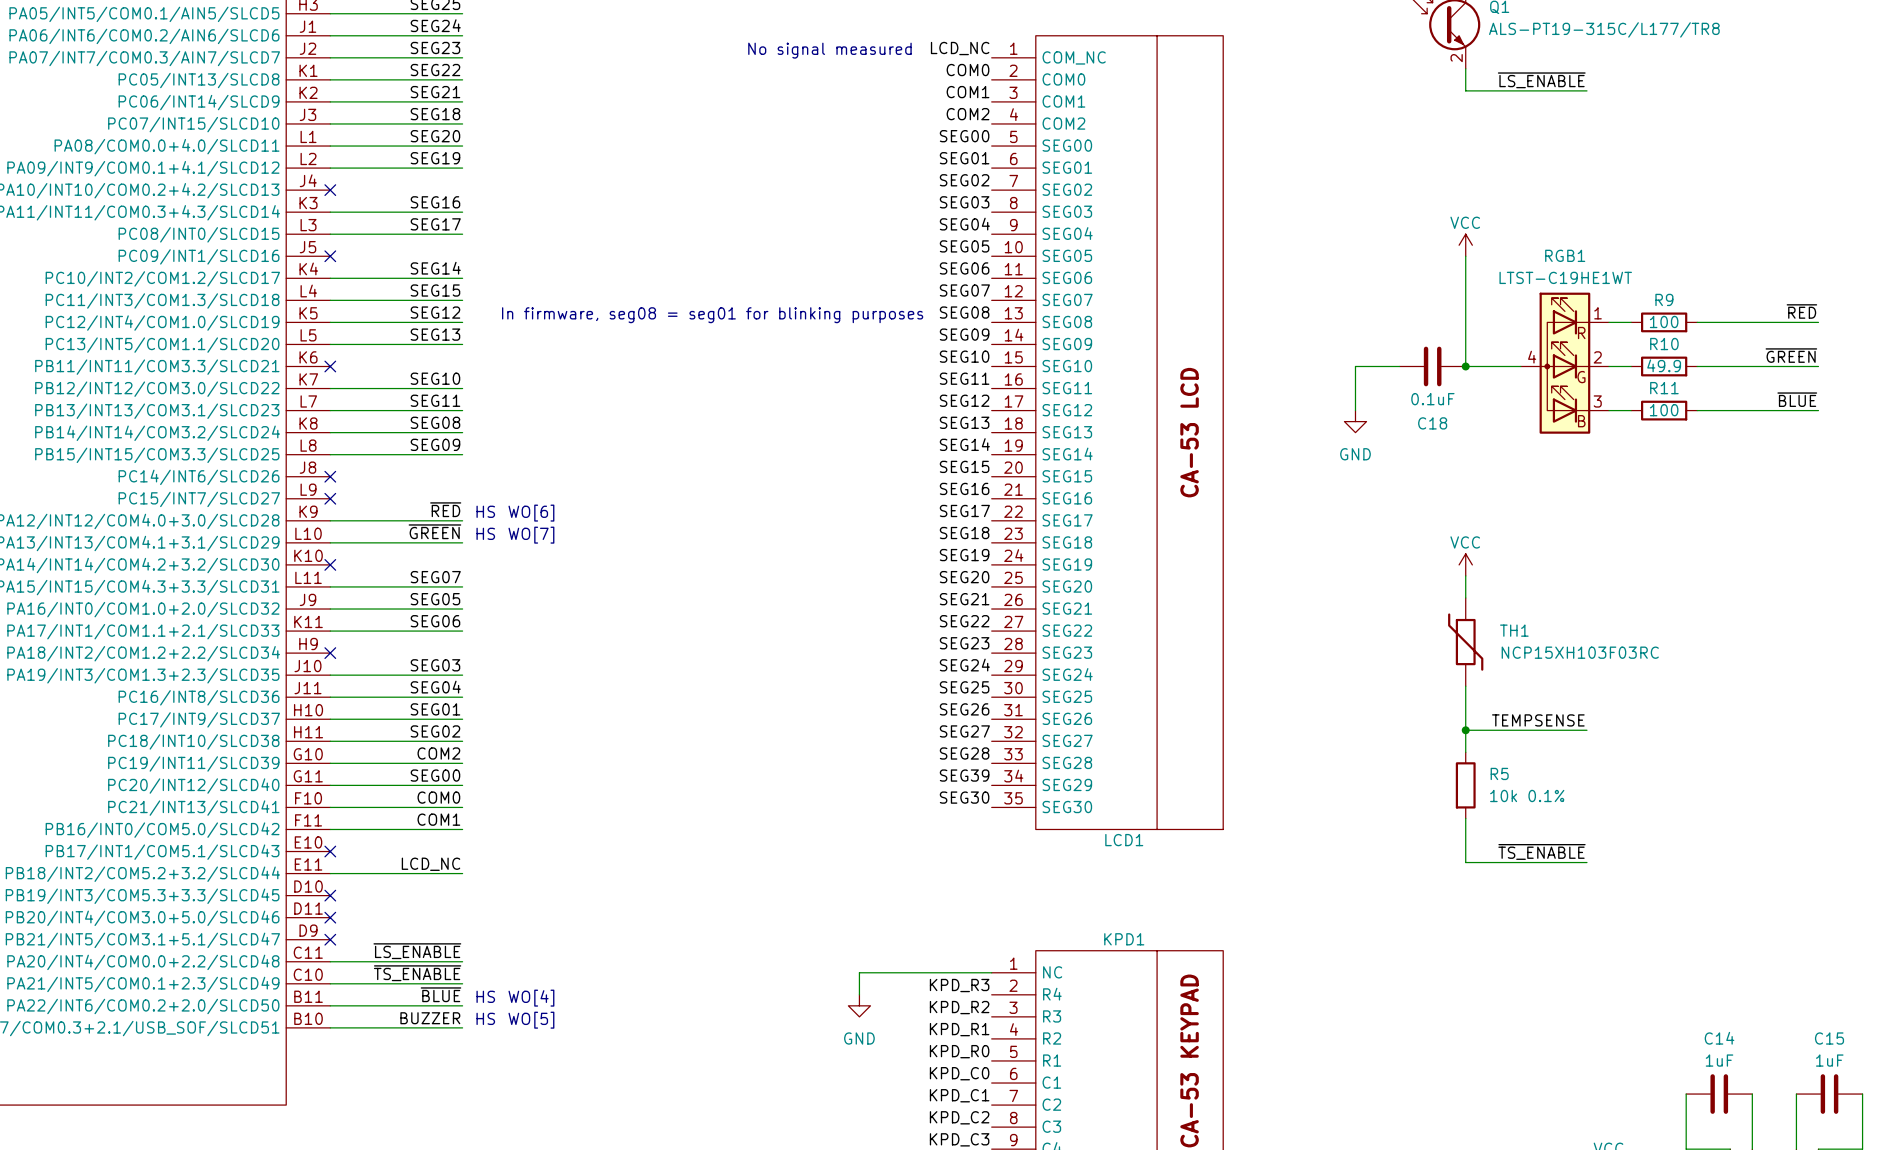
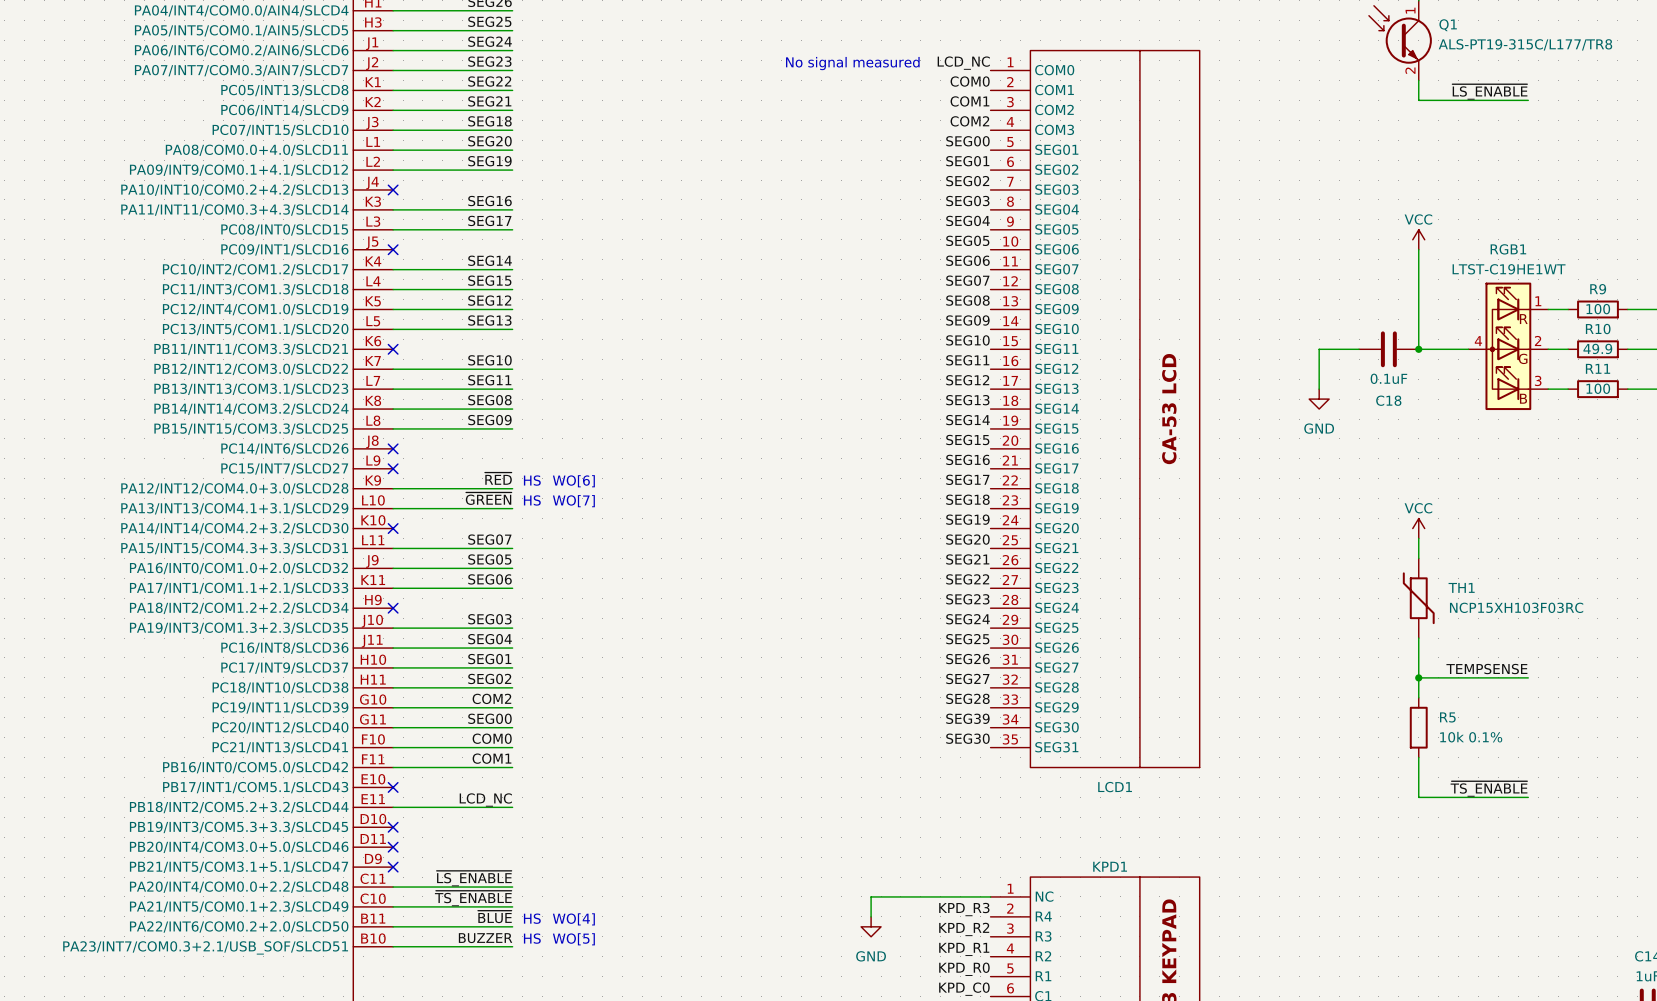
LCD1 symbol: [991, 35, 1224, 830] -> [990, 50, 1200, 768]
text: In firmware, seg08 = seg01 for blinking purposes (712, 315) -> none

